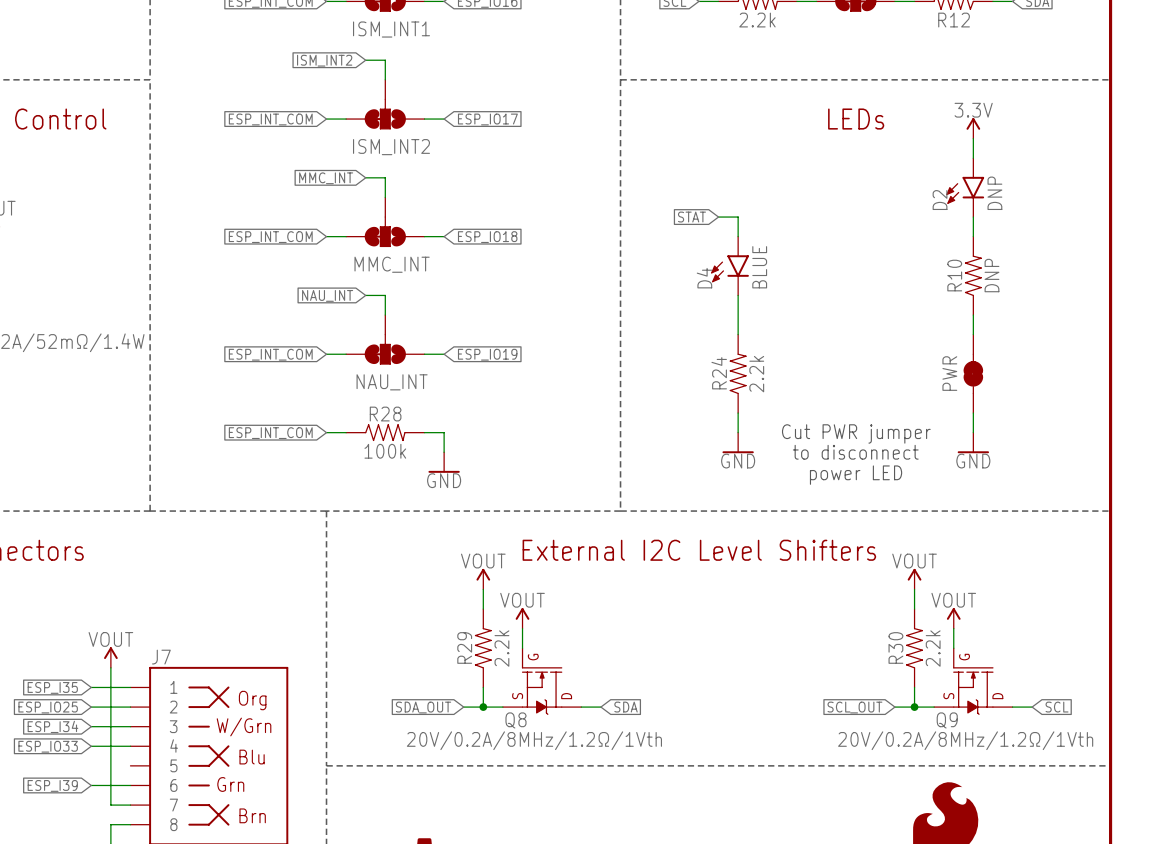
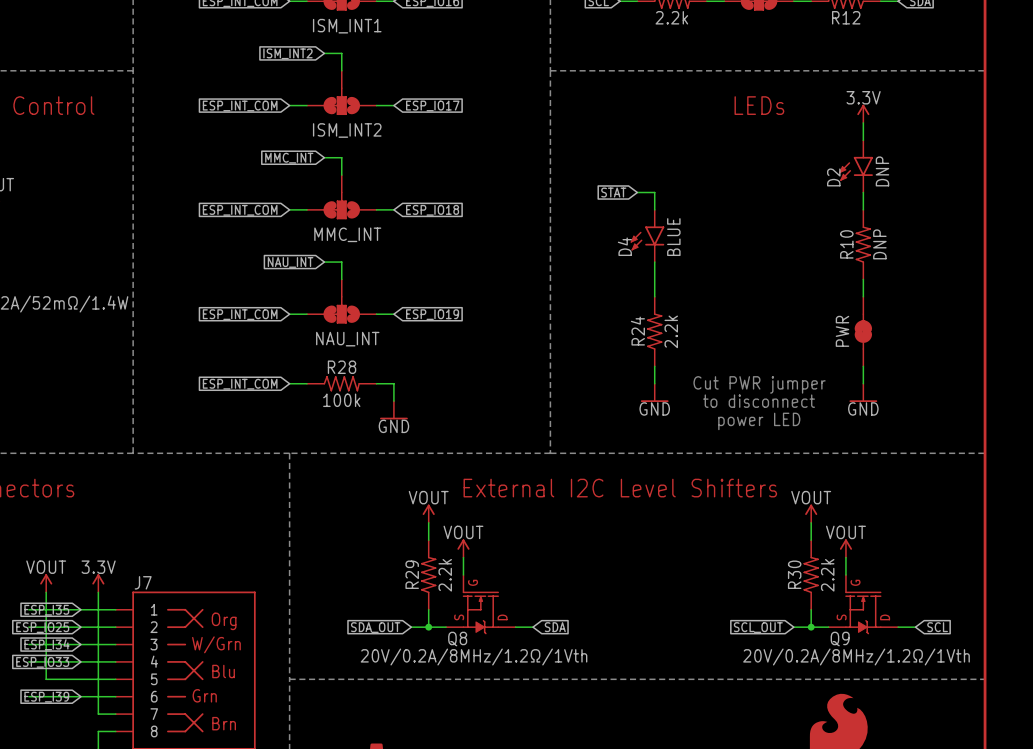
power symbol: none -> VOUT (46, 583)
power symbol: VOUT (110, 657) -> 3.3V (98, 583)
wire: none -> (46, 592) (46, 679) (115, 679)
wire: none -> (28, 609) (80, 609)
wire: none -> (28, 627) (80, 627)
wire: none -> (28, 644) (80, 644)
wire: none -> (28, 661) (80, 661)
wire: none -> (28, 696) (80, 696)

